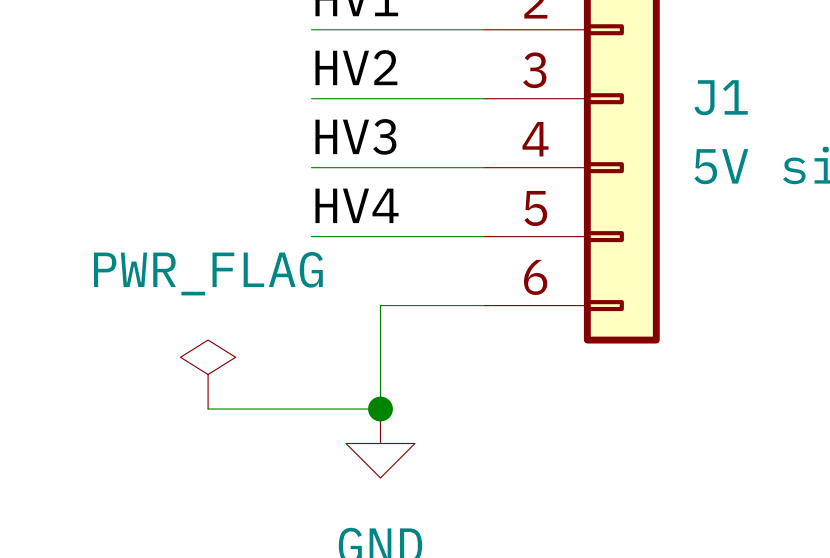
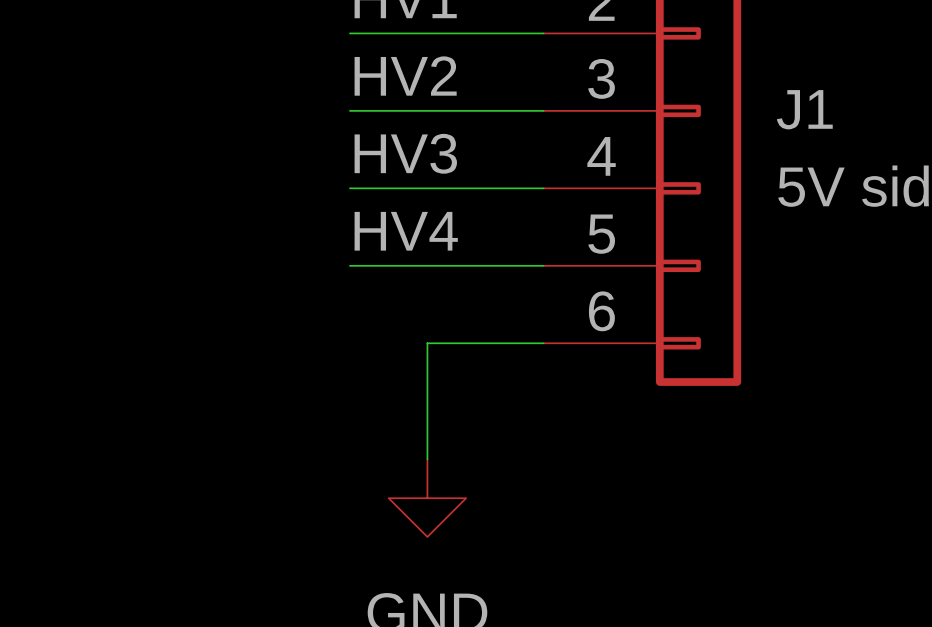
power symbol: PWR_FLAG (208, 374) -> none
wire: (208, 409) (380, 409) -> none
junction: (380, 409) -> none

